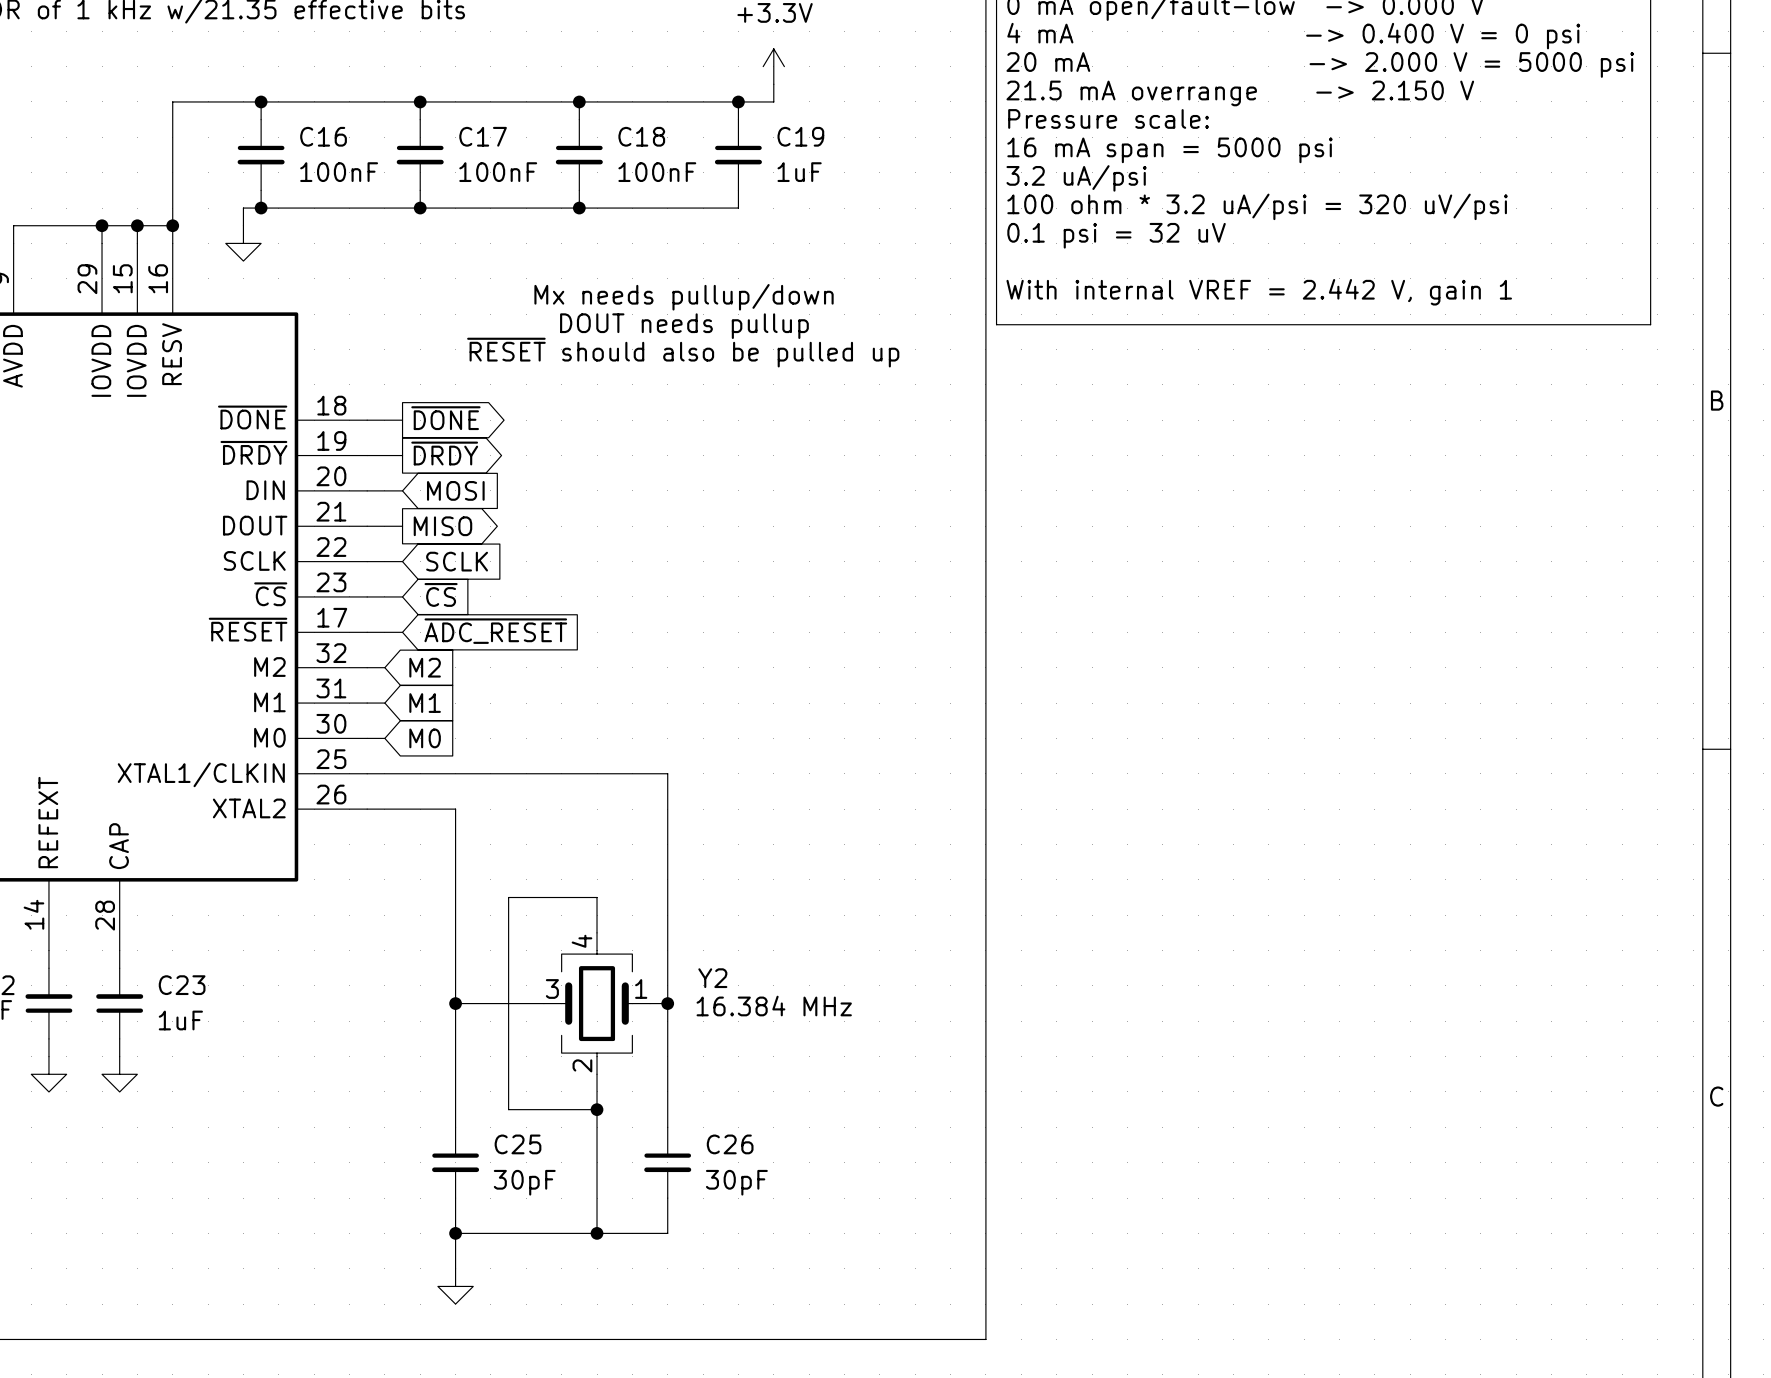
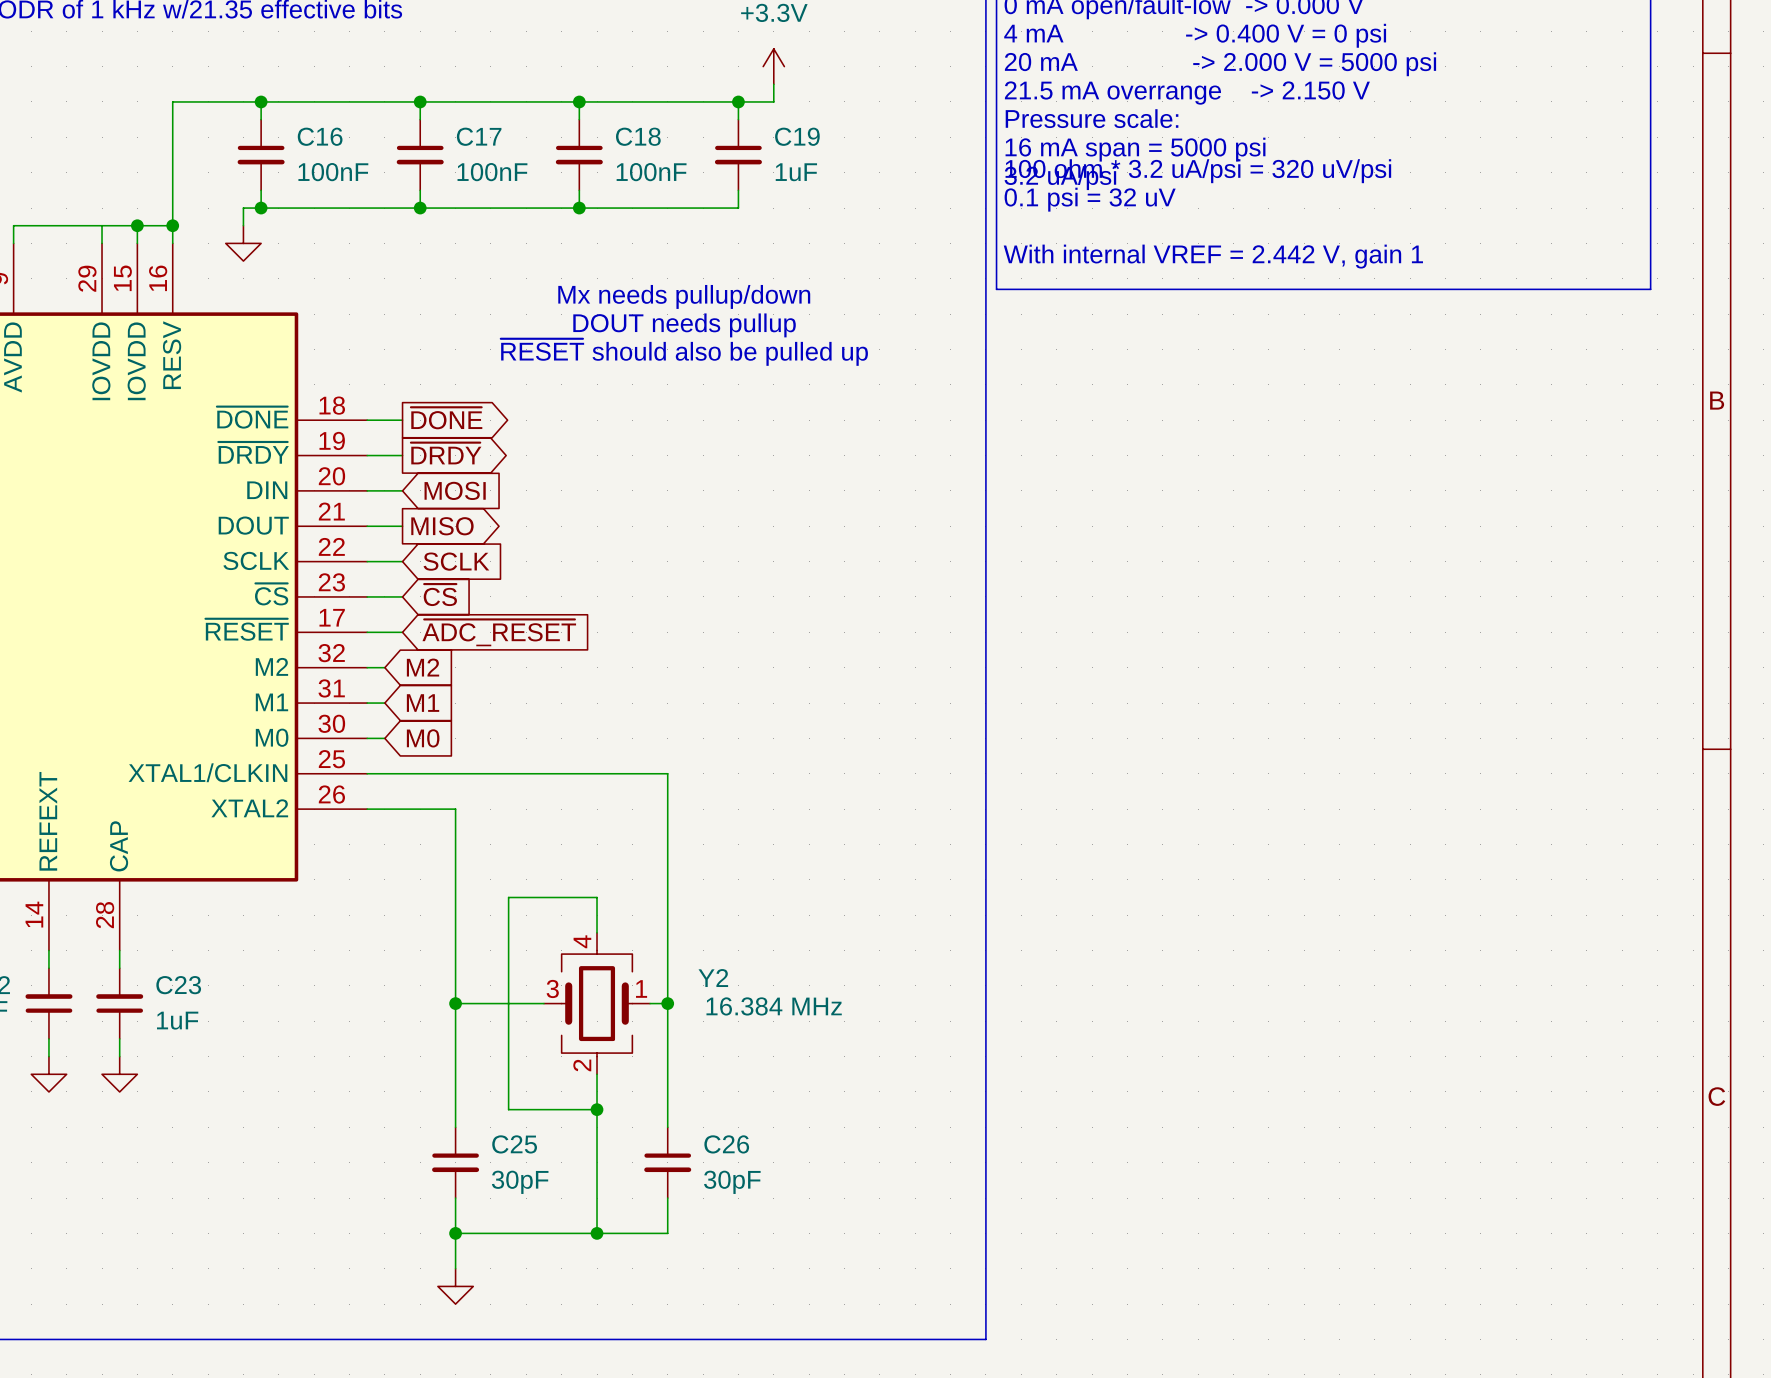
text position: 100 ohm * 3.2 uA/psi = 320 uV/psi (1257, 206) -> 100 ohm * 3.2 uA/psi = 320 uV/psi (1198, 171)
junction: (102, 225) -> none
text position: 0.1 psi = 32 uV (1116, 235) -> 0.1 psi = 32 uV (1090, 199)
line: (996, 289) (996, 324) (1650, 324) (1650, 289) -> (996, 289) (1650, 289)
text position: With internal VREF = 2.442 V, gain 1 (1259, 292) -> With internal VREF = 2.442 V, gain 1 (1213, 256)

